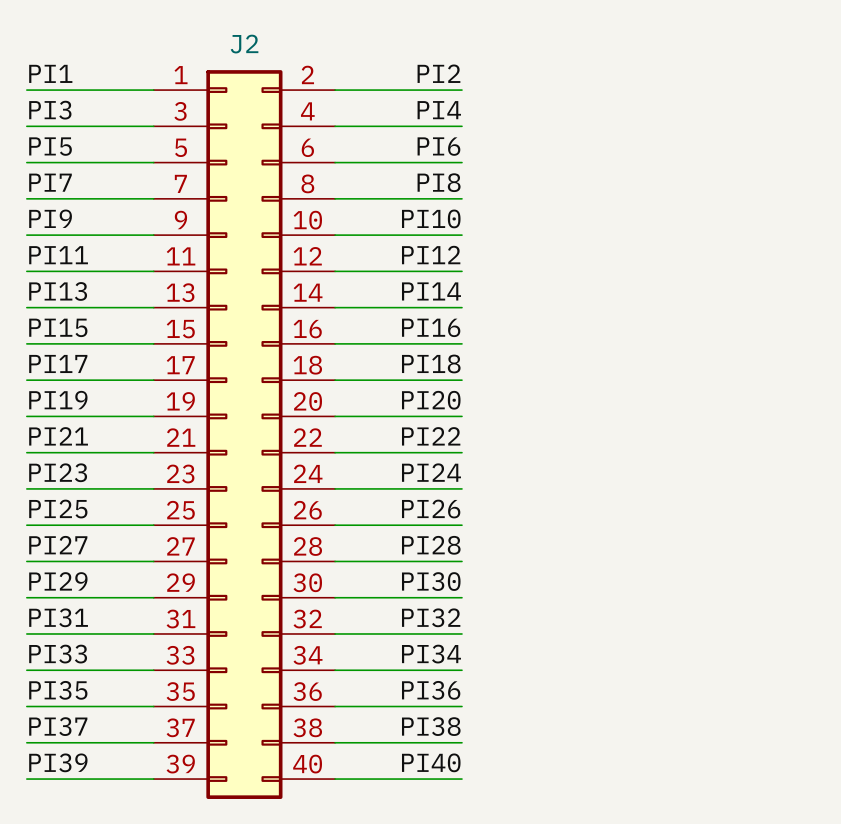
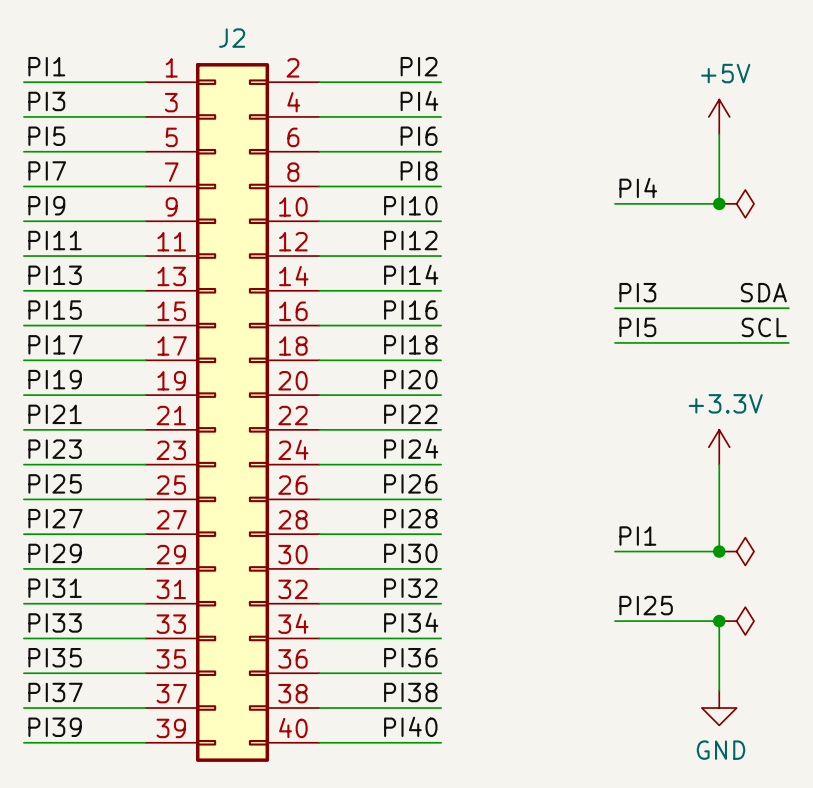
power symbol: none -> +5V (719, 116)
wire: none -> (719, 134) (719, 203) (614, 203)
label: none -> PI4 (638, 187)
junction: none -> (719, 203)
power symbol: none -> (736, 203)
label: none -> PI3 (637, 292)
label: none -> SDA (763, 292)
wire: none -> (614, 308) (788, 308)
label: none -> SCL (764, 327)
label: none -> PI5 (637, 327)
wire: none -> (614, 342) (788, 342)
power symbol: none -> +3.3V (719, 447)
wire: none -> (719, 464) (719, 551) (614, 551)
label: none -> PI1 (637, 536)
junction: none -> (719, 551)
power symbol: none -> (736, 551)
label: none -> PI25 (646, 605)
wire: none -> (614, 621) (719, 621) (719, 690)
junction: none -> (719, 621)
power symbol: none -> (736, 621)
power symbol: none -> GND (719, 708)

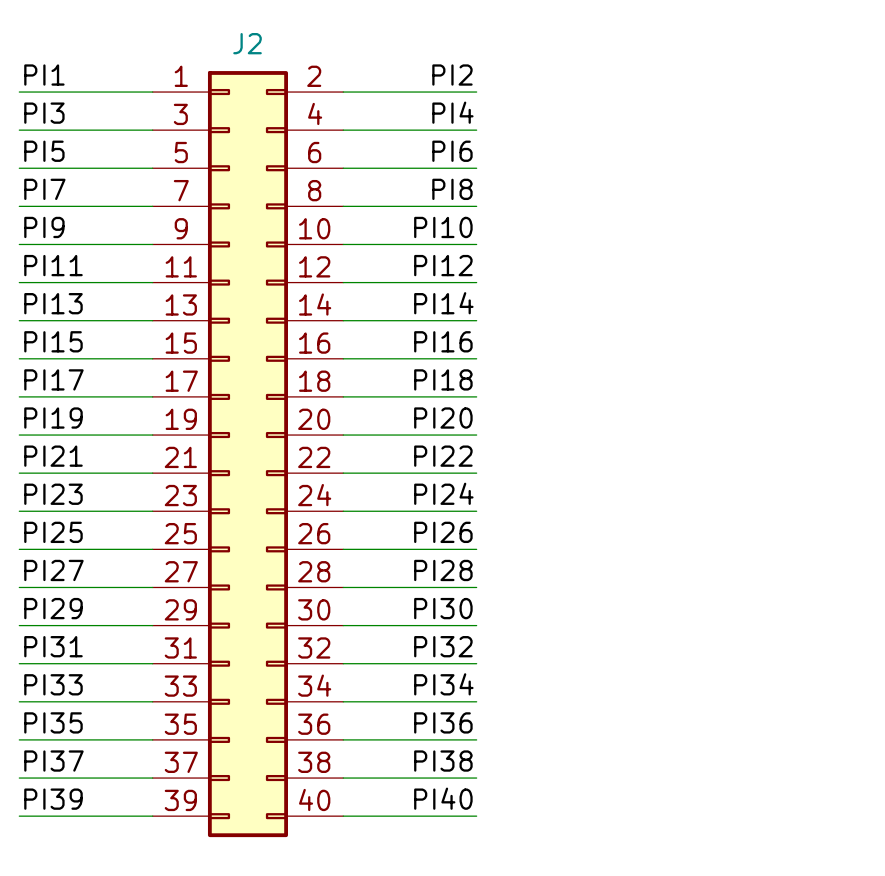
power symbol: +5V (719, 116) -> none
wire: (719, 134) (719, 203) (614, 203) -> none
label: PI4 (638, 187) -> none
junction: (719, 203) -> none
power symbol: (736, 203) -> none
label: PI3 (637, 292) -> none
label: SDA (763, 292) -> none
wire: (614, 308) (788, 308) -> none
label: PI5 (637, 327) -> none
label: SCL (764, 327) -> none
wire: (614, 342) (788, 342) -> none
power symbol: +3.3V (719, 447) -> none
wire: (719, 464) (719, 551) (614, 551) -> none
label: PI1 (637, 536) -> none
junction: (719, 551) -> none
power symbol: (736, 551) -> none
label: PI25 (646, 605) -> none
wire: (614, 621) (719, 621) (719, 690) -> none
junction: (719, 621) -> none
power symbol: (736, 621) -> none
power symbol: GND (719, 708) -> none

